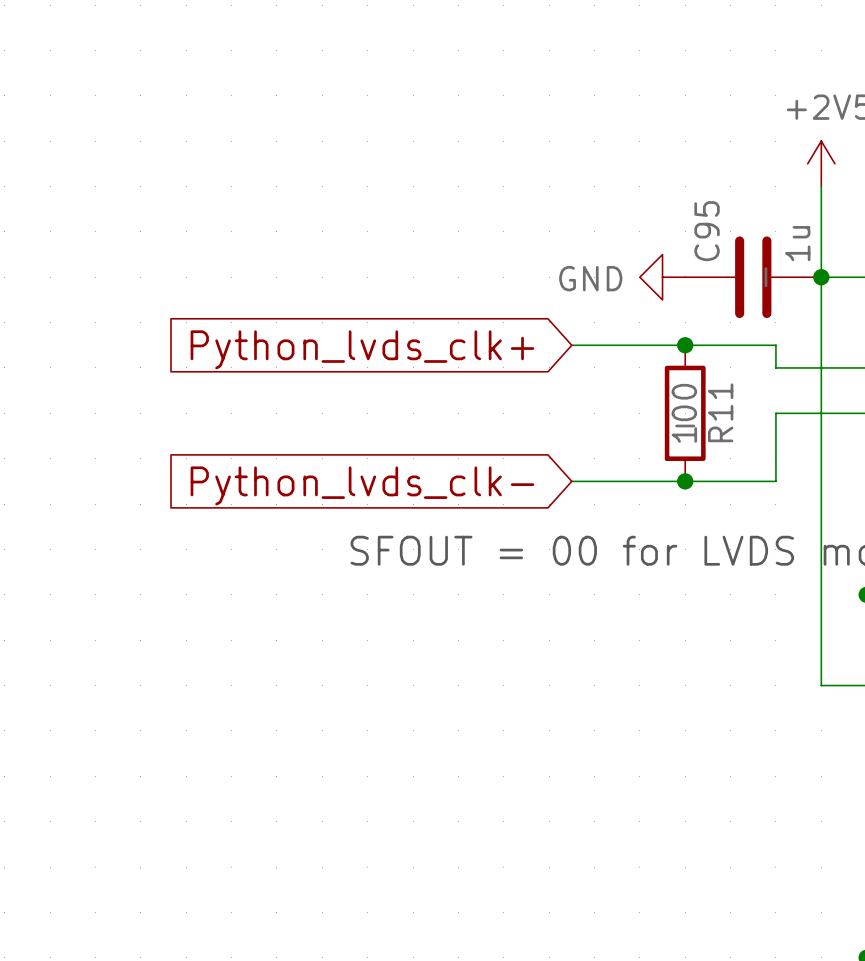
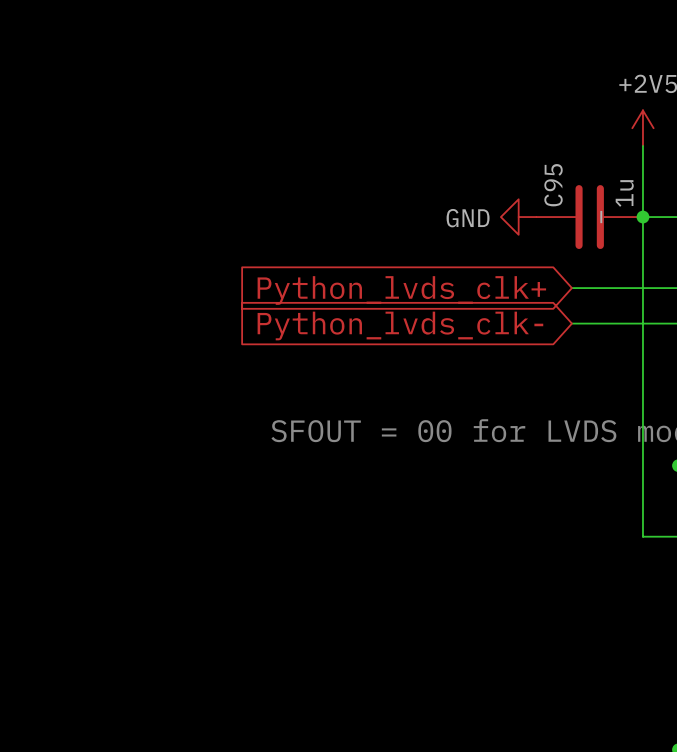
wire: (571, 345) (775, 345) (775, 367) -> (571, 288) (607, 288)
junction: (685, 345) -> none
global label position: Python_lvds_clk+ (362, 349) -> Python_lvds_clk+ (401, 290)
R11: 100 (685, 413) -> none
wire: (775, 413) (775, 481) (571, 481) -> (607, 323) (571, 323)
junction: (685, 481) -> none
global label position: Python_lvds_clk- (362, 485) -> Python_lvds_clk- (400, 326)

